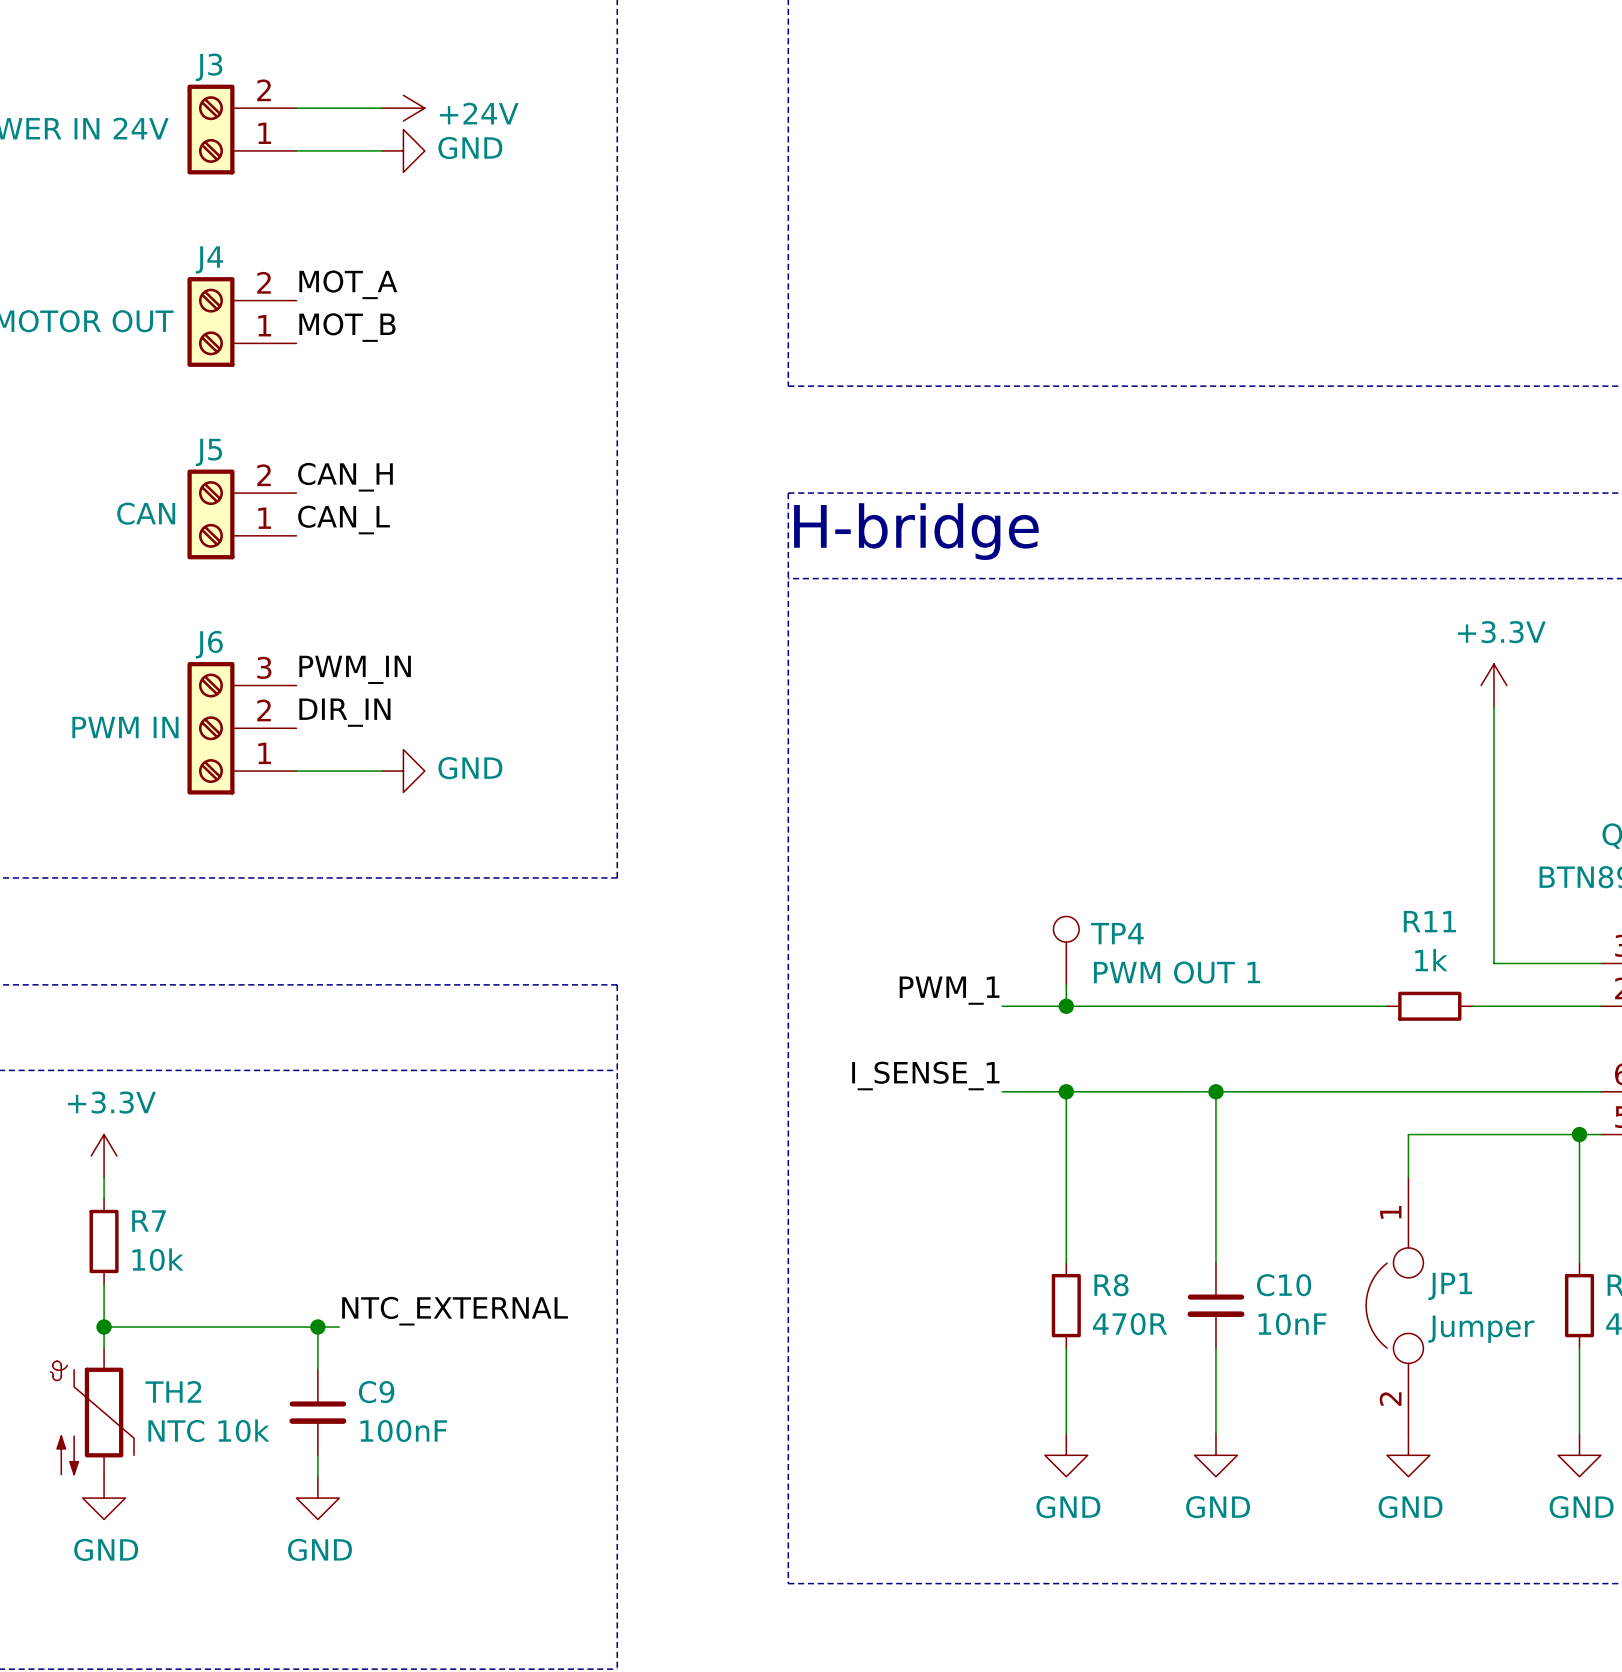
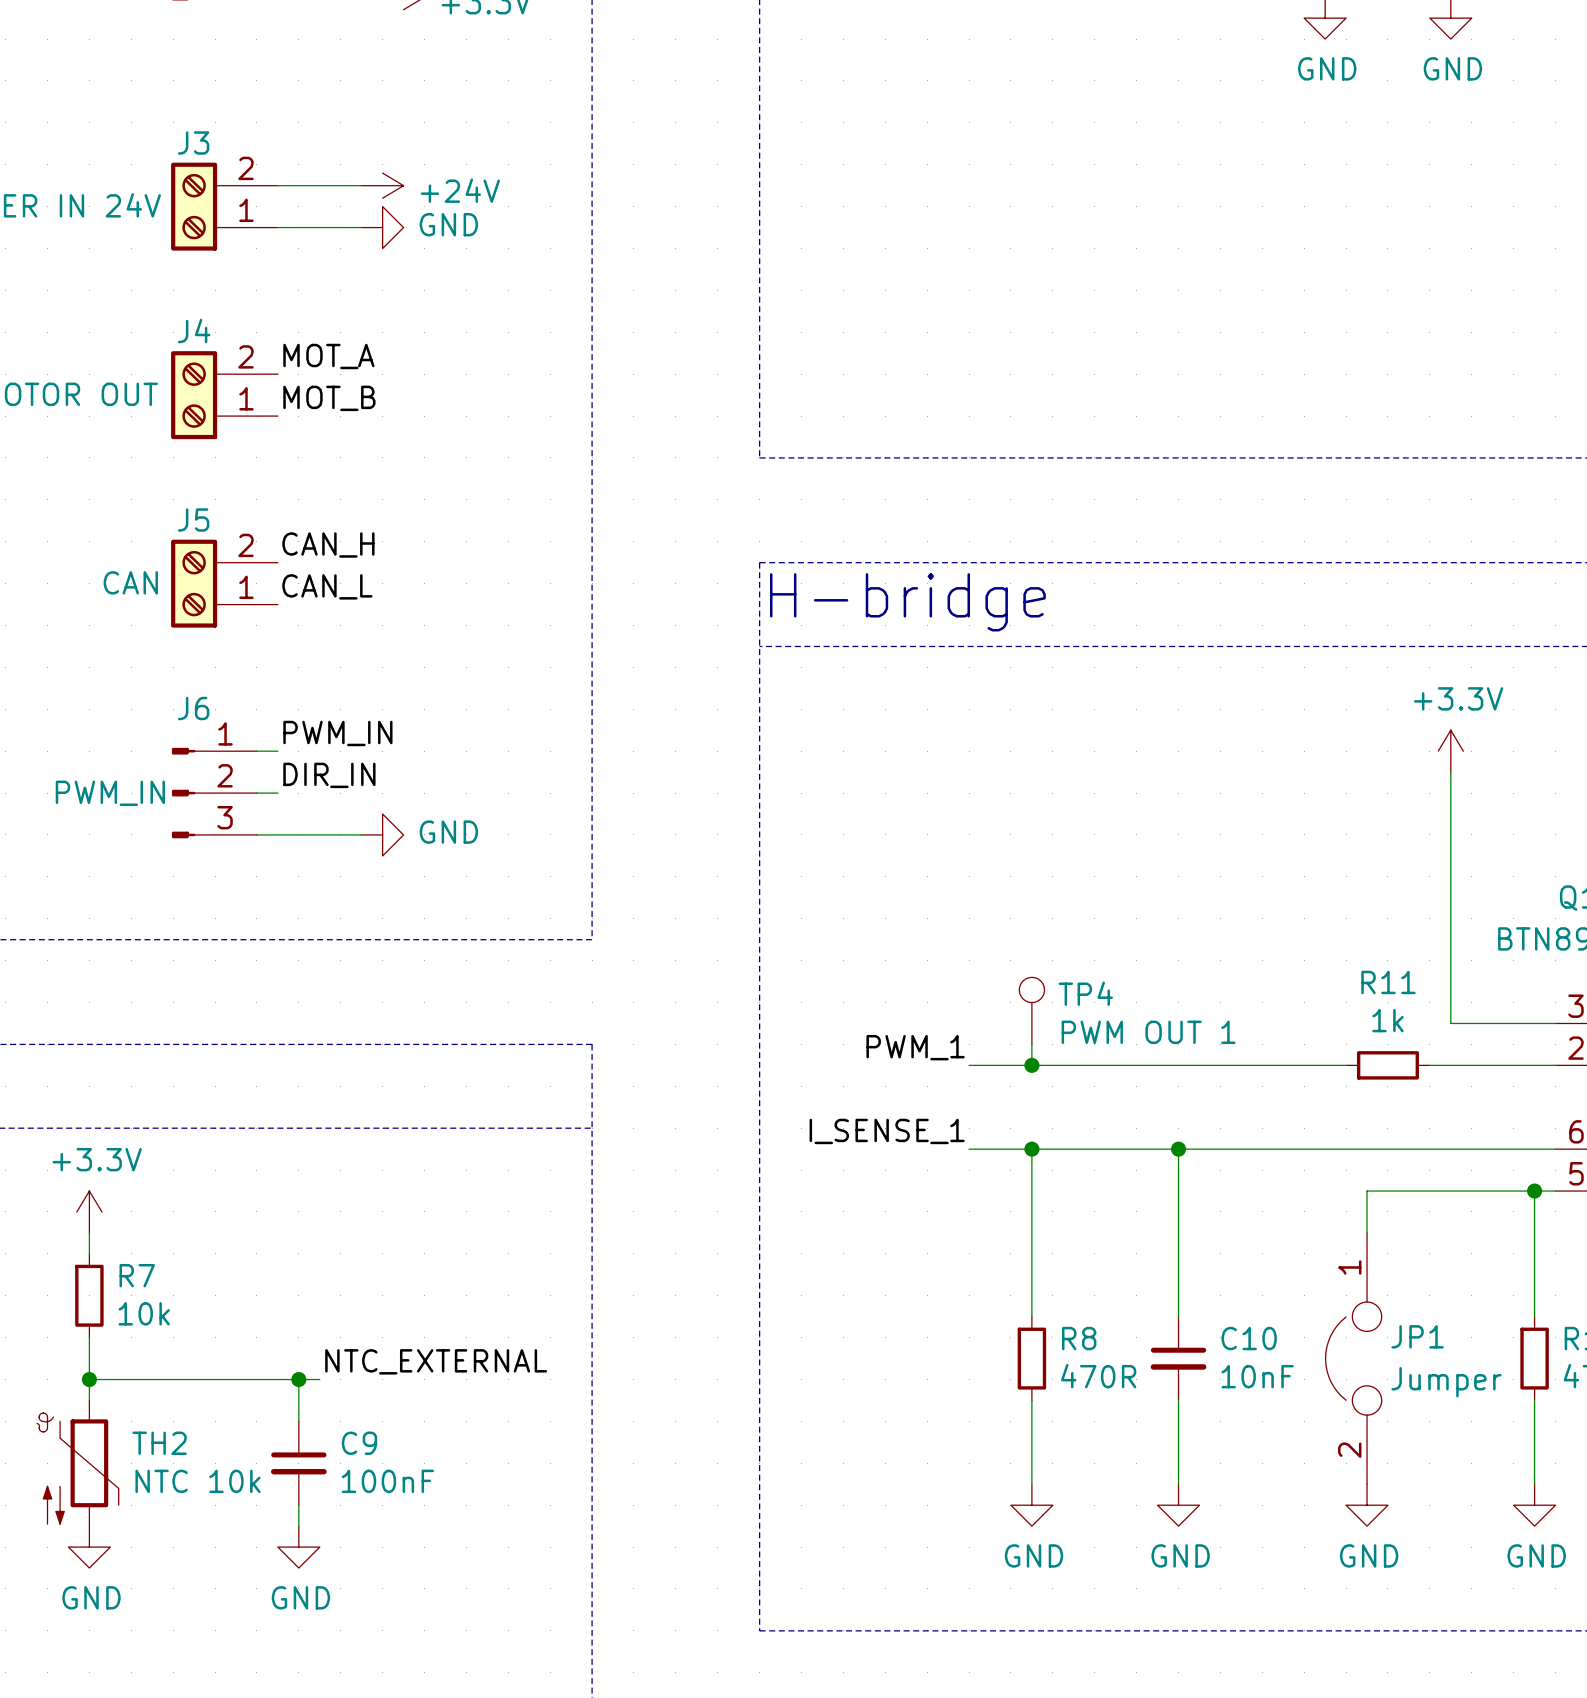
J6 symbol: [187, 661, 297, 795] -> [171, 747, 257, 839]
J6 value: PWM IN (125, 727) -> PWM_IN (110, 793)

